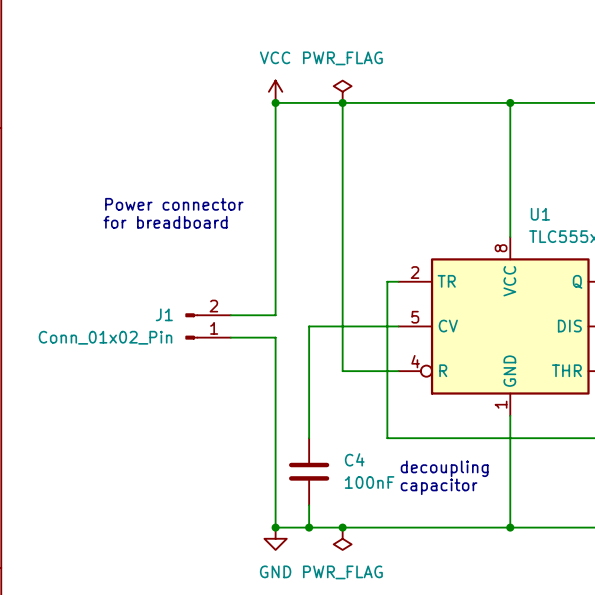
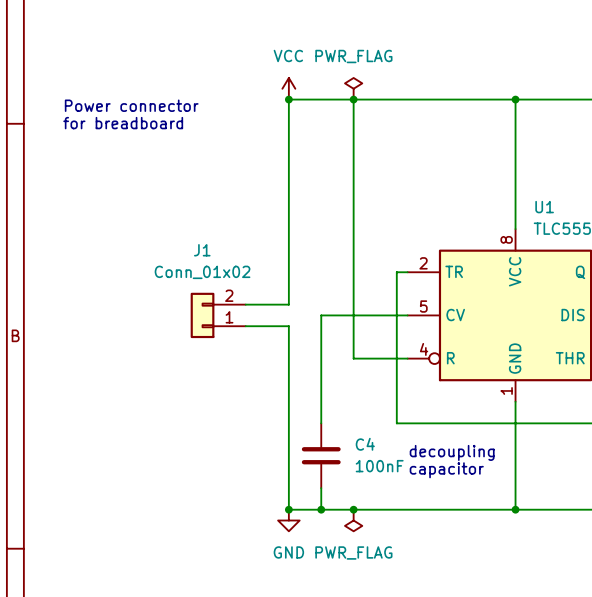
text position: Power connector (174, 204) -> Power connector (131, 105)
text position: for breadboard (165, 222) -> for breadboard (123, 123)
J1 symbol: [185, 313, 231, 340] -> [190, 292, 246, 339]
J1 name position: J1 (164, 314) -> J1 (202, 250)
J1 value: Conn_01x02_Pin (105, 337) -> Conn_01x02 (202, 272)

